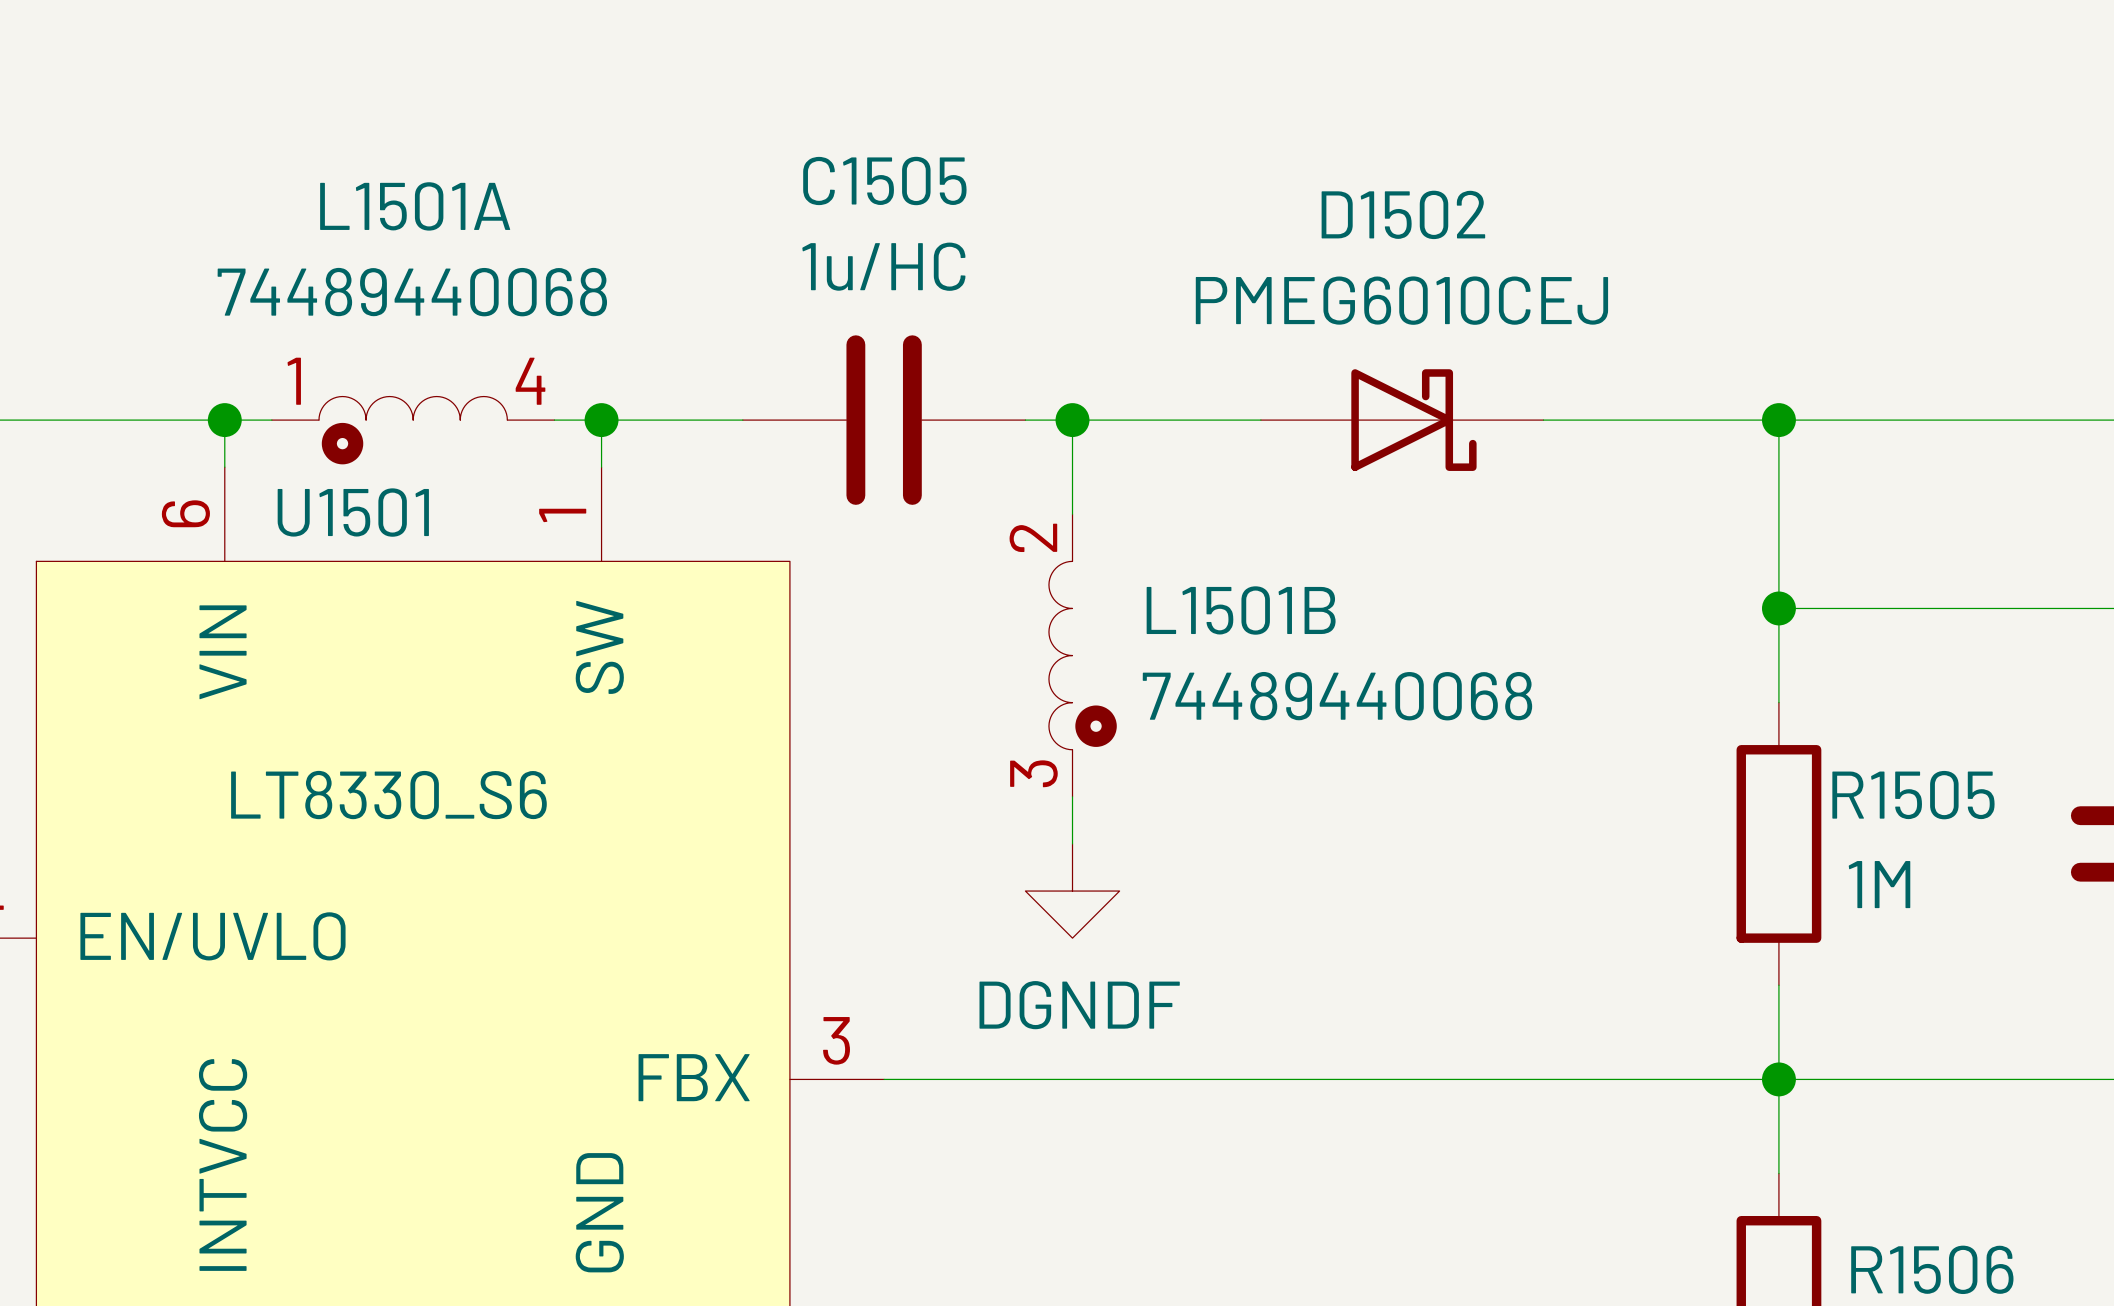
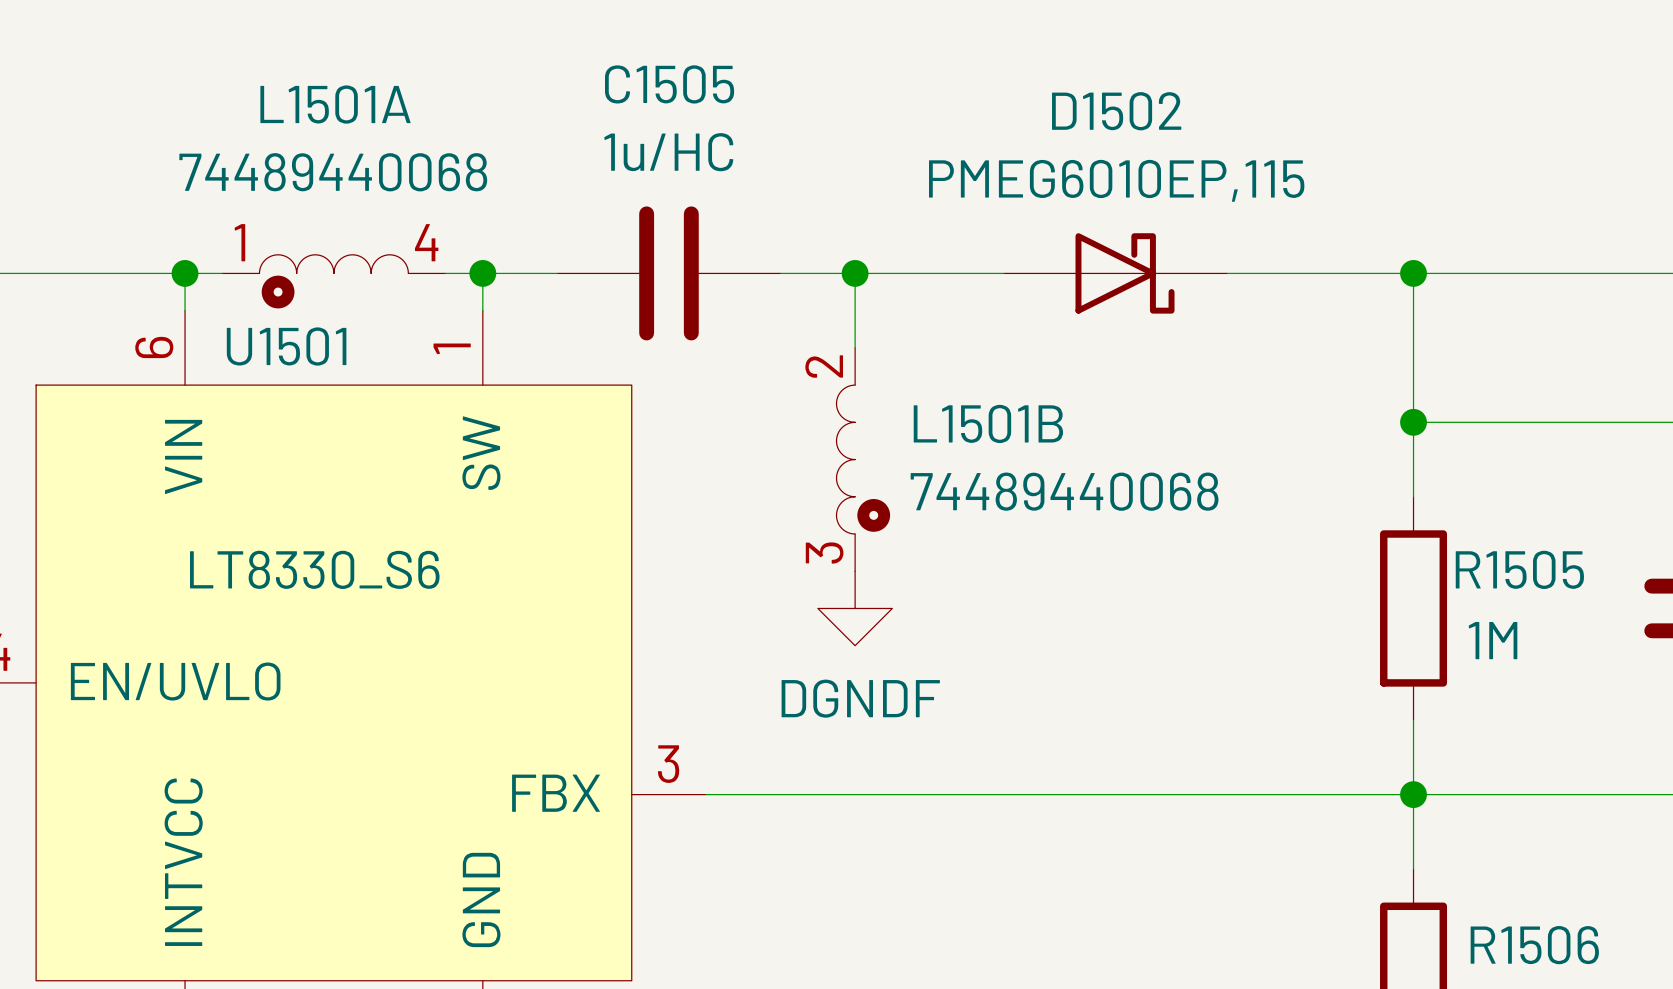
D1502 value: PMEG6010CEJ (1401, 300) -> PMEG6010EP,115 (1116, 180)
C1505 position: (884, 420) -> (668, 273)
power symbol position: DGNDF (1072, 891) -> DGNDF (855, 608)

